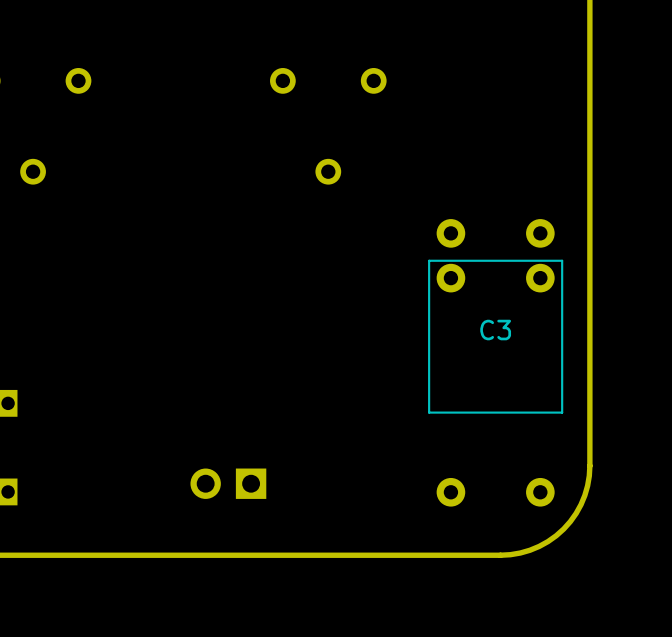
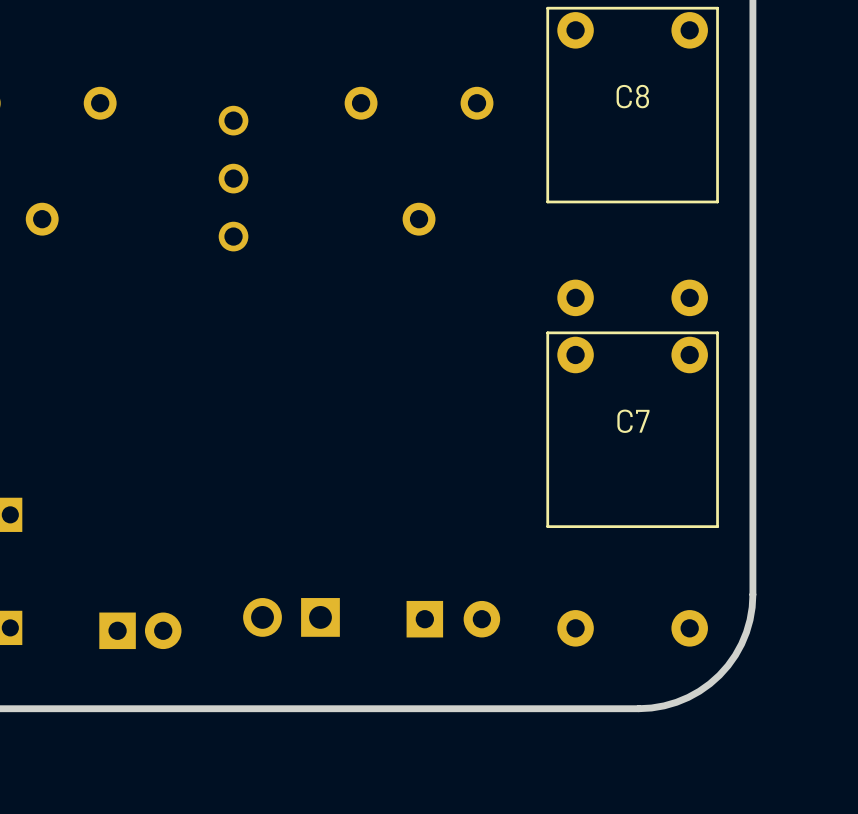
C8: none -> (632, 105)
part: none -> (233, 178)
C3 name: C3 (495, 330) -> C7 (633, 421)
part: none -> (453, 619)
part: none -> (140, 630)

